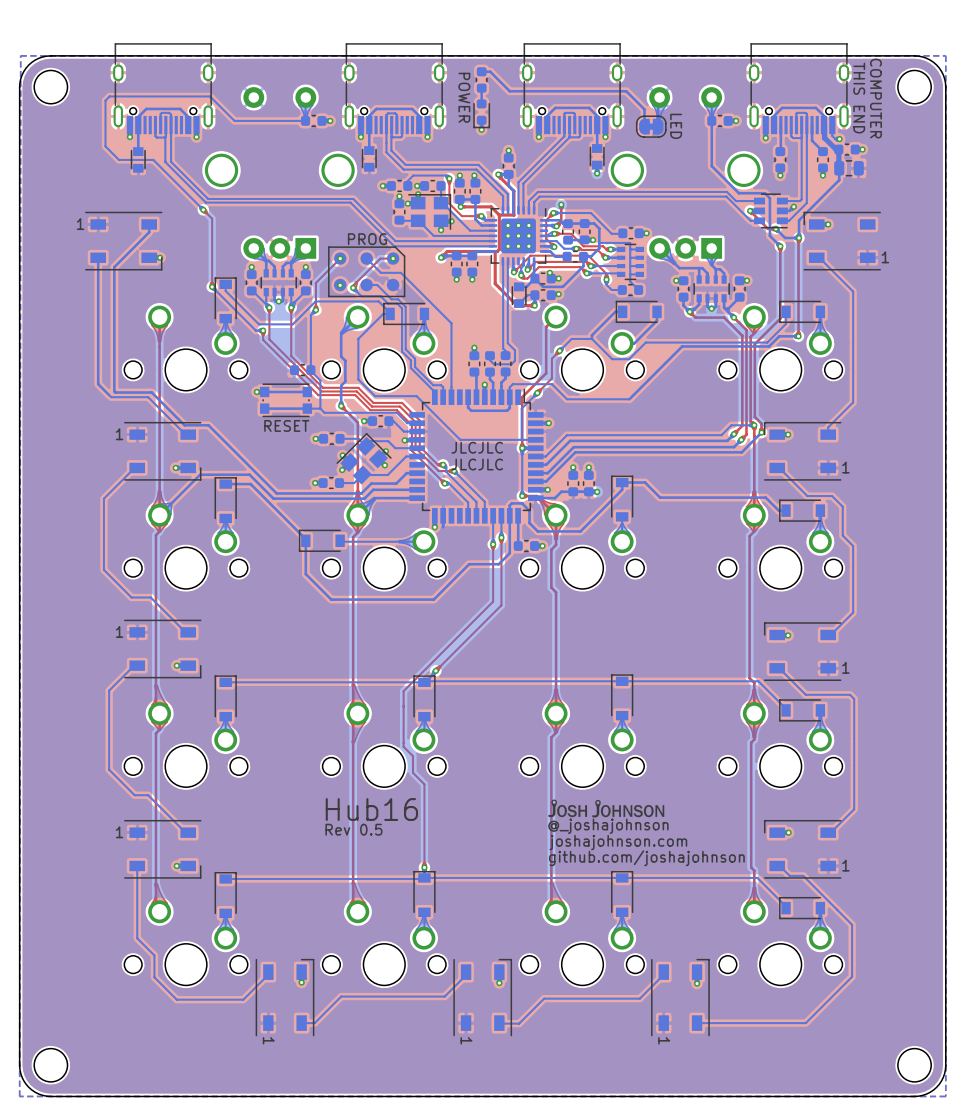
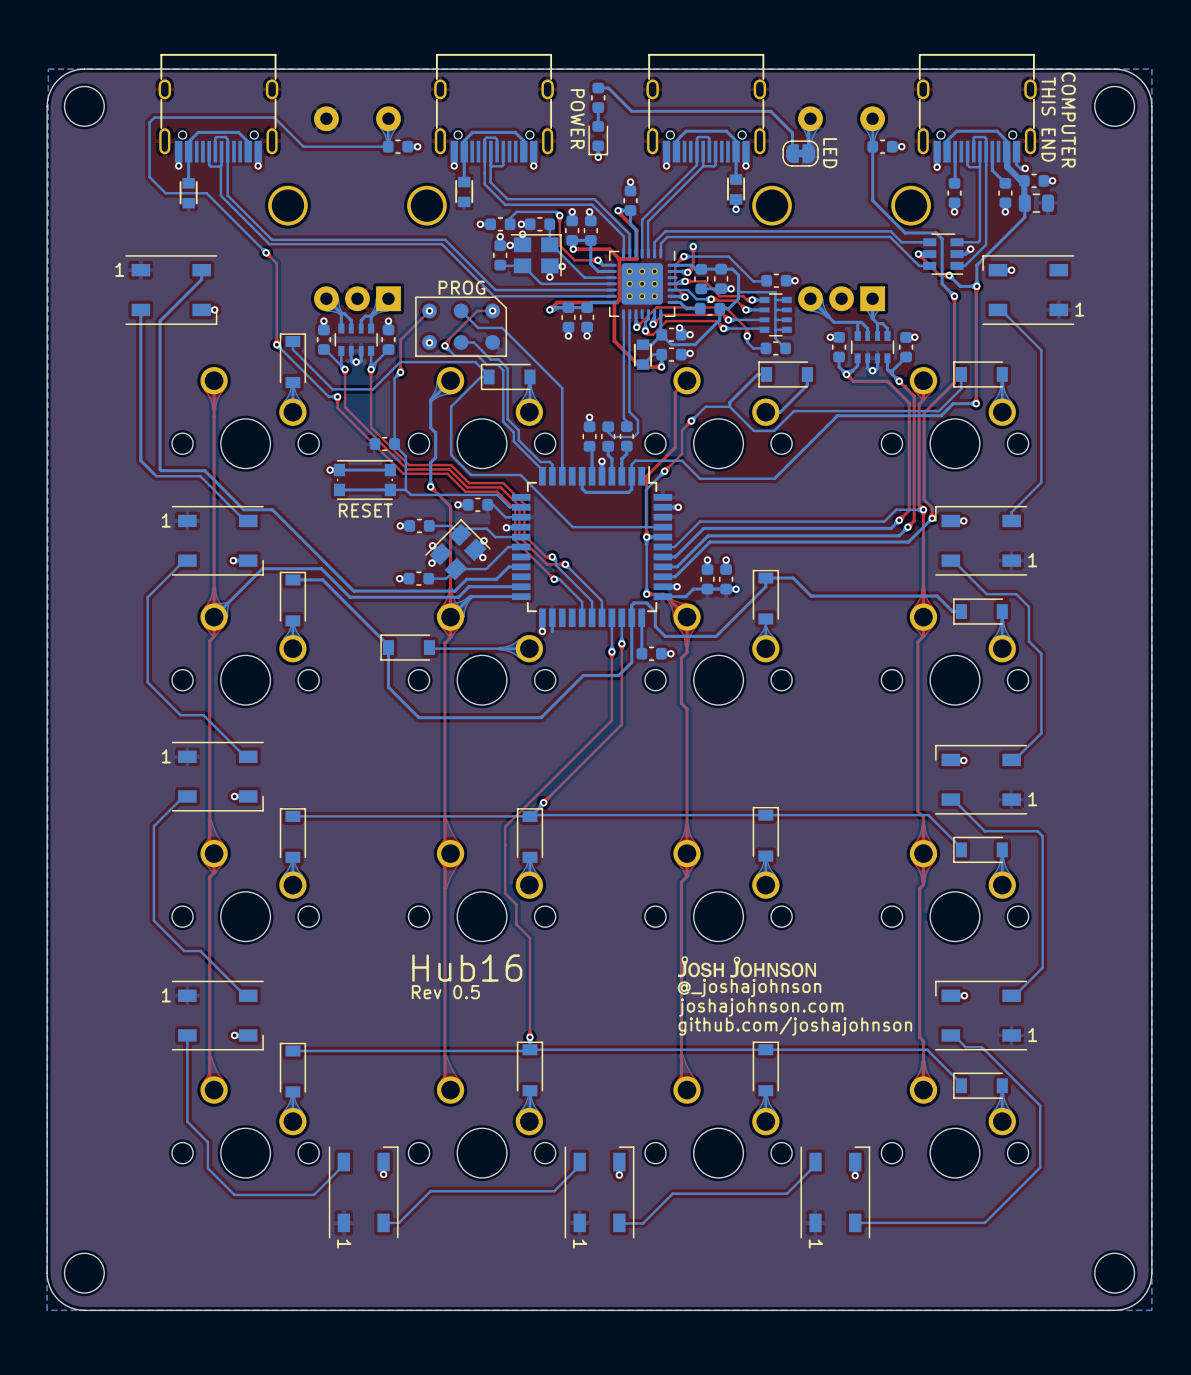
text: JLCJLC (477, 447) -> none
text: JLCJLC (477, 464) -> none

